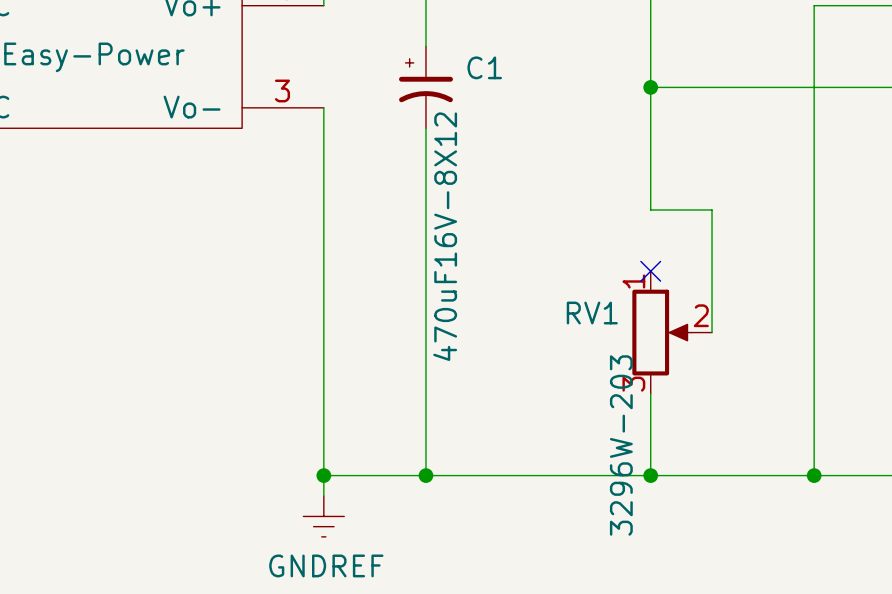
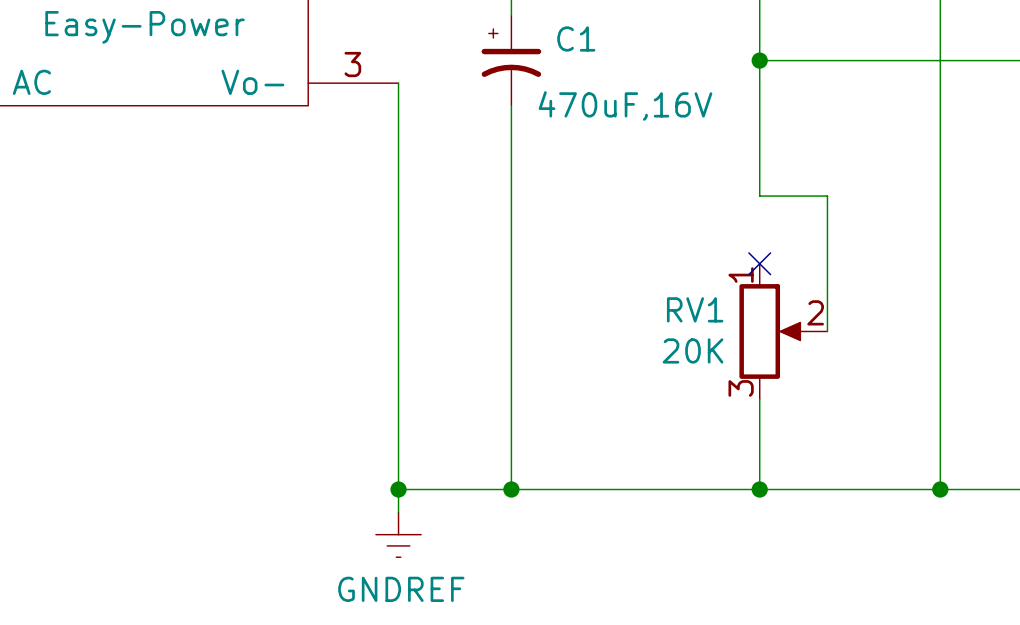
C1 value: 470uF16V-8X12 (445, 236) -> 470uF,16V (625, 105)
RV1 value: 3296W-203 (621, 445) -> 20K (693, 350)

